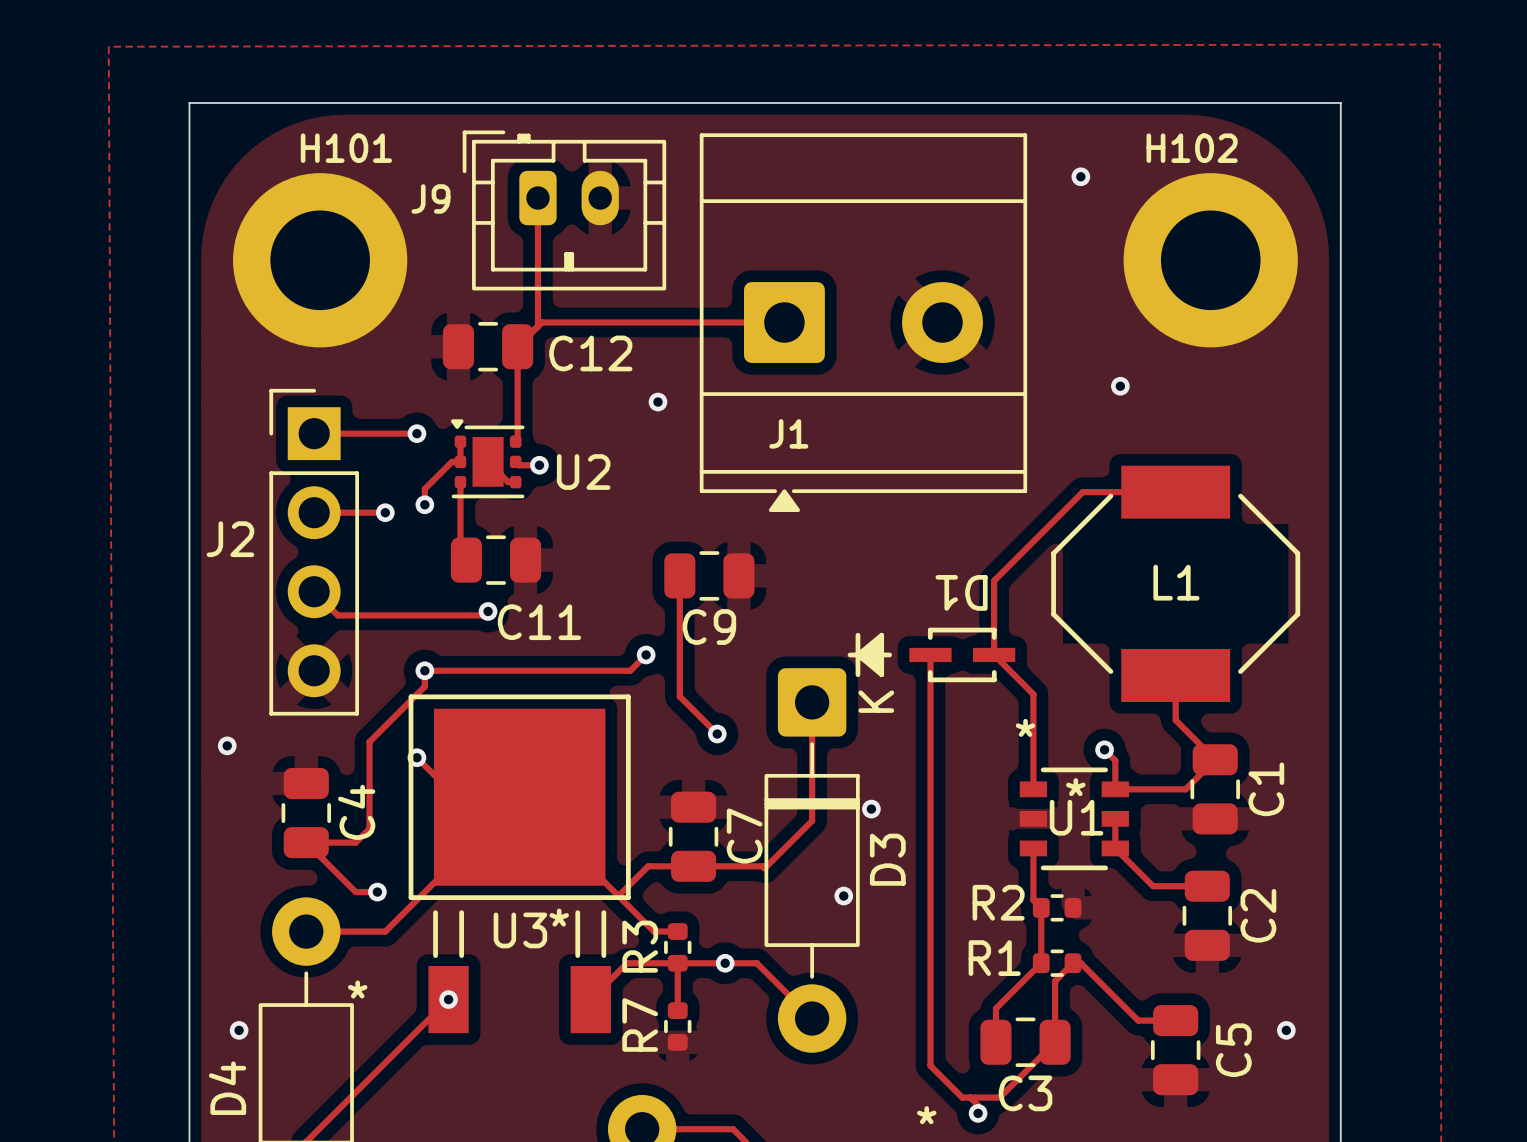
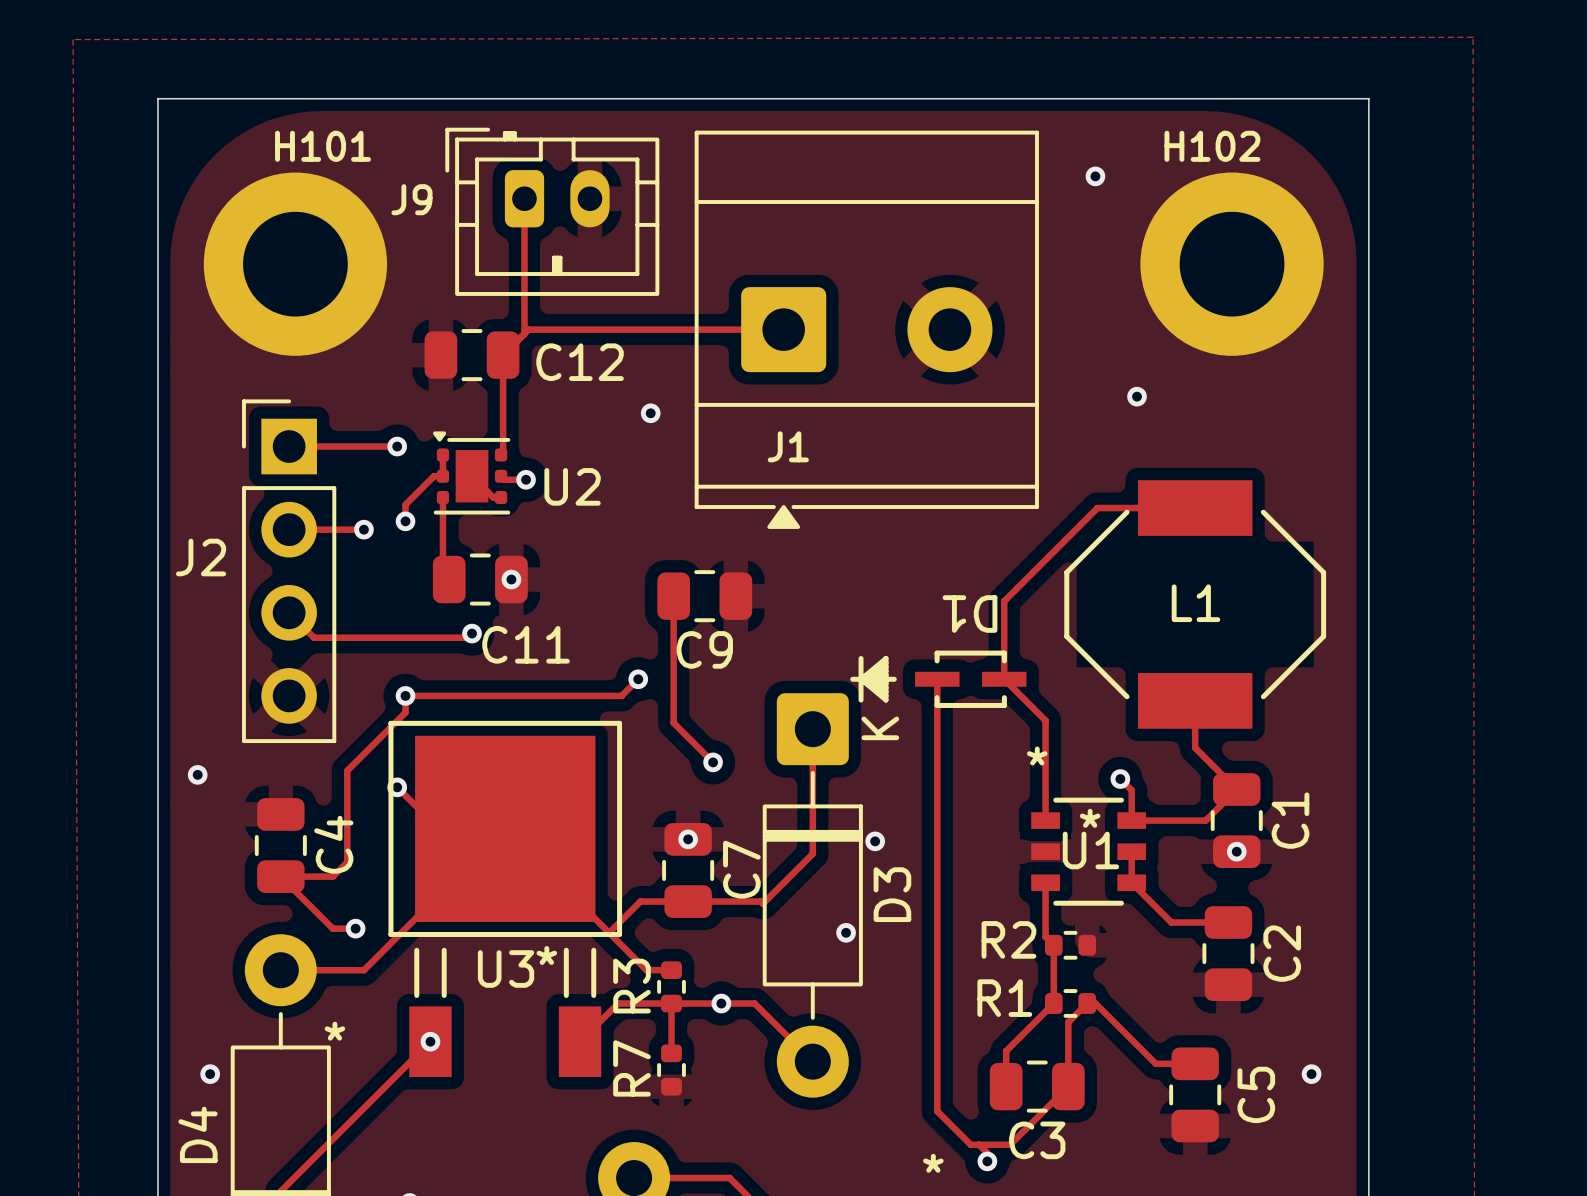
via: none -> (511, 579)
via: none -> (688, 839)
via: none -> (1236, 851)

